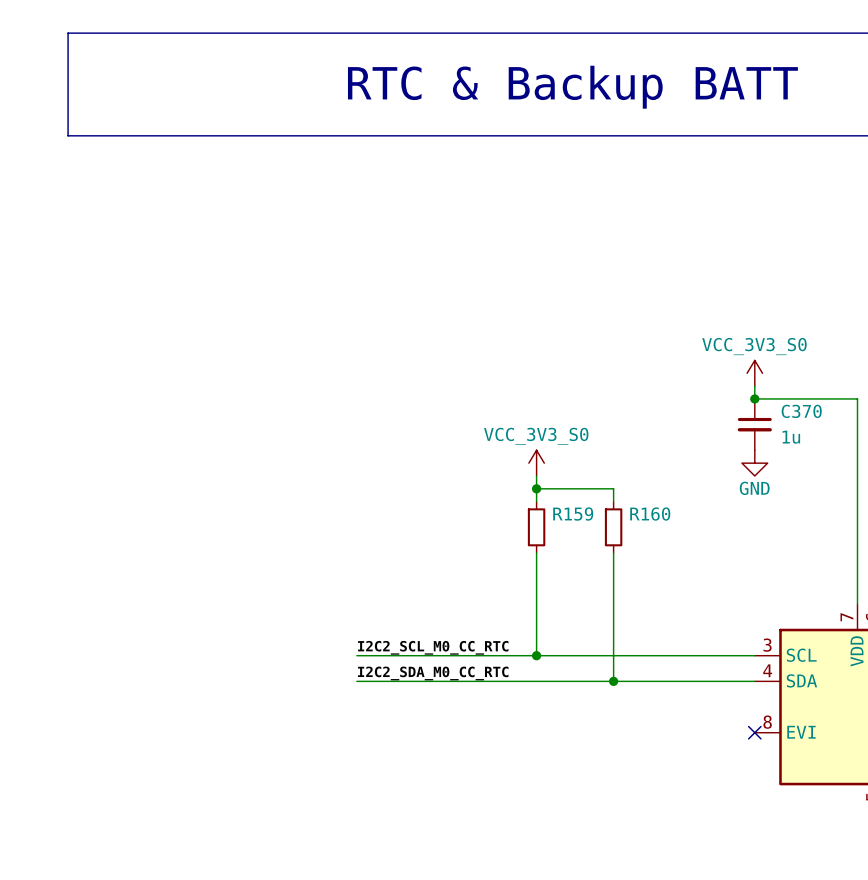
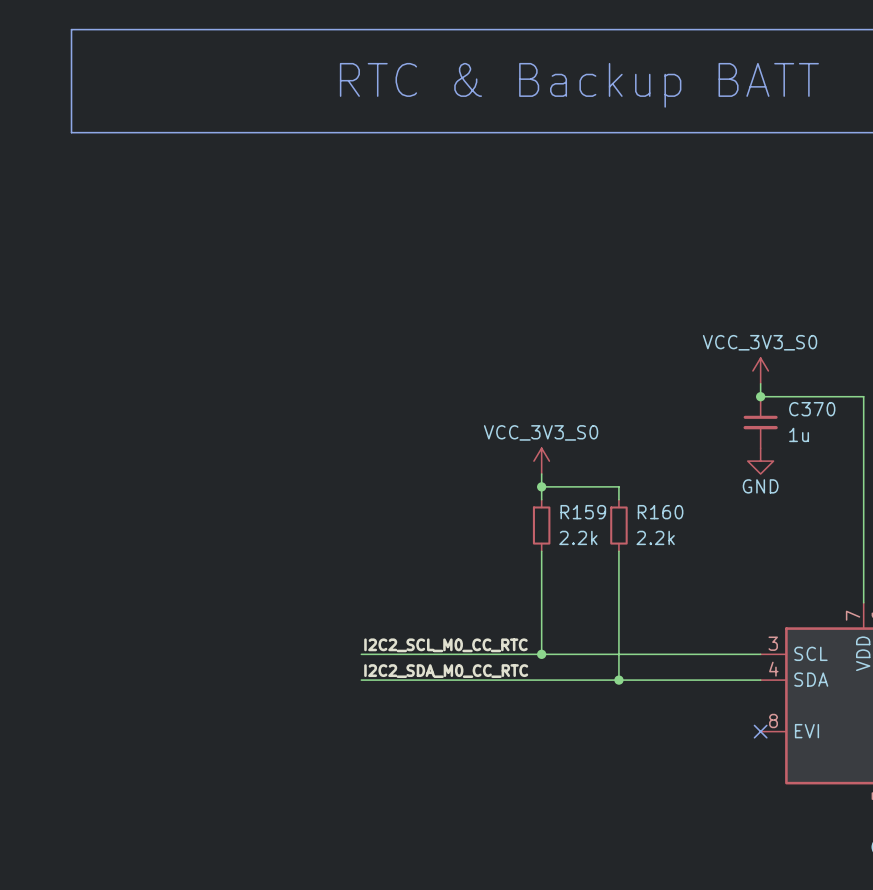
R159 value: none -> 2.2k (578, 537)
R160 value: none -> 2.2k (655, 537)

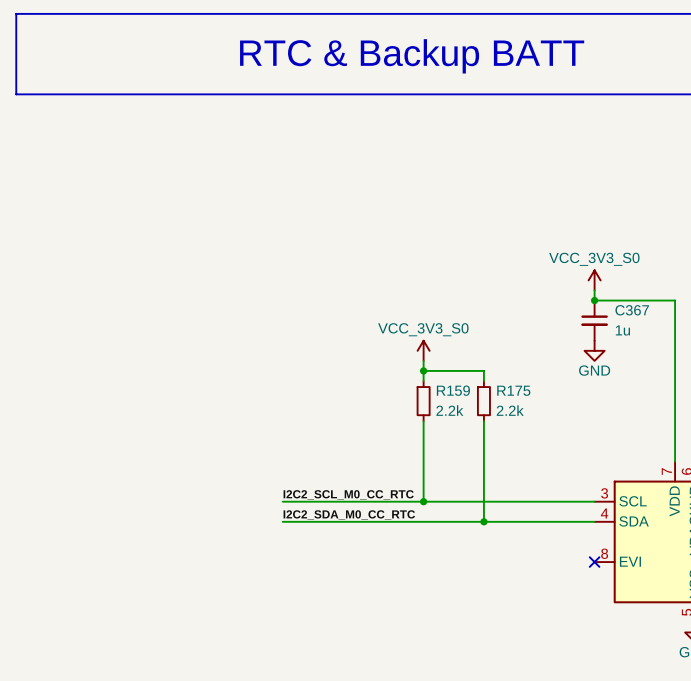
line: (71, 29) (71, 132) -> (56, 13) (16, 13) (16, 94) (56, 94)
text position: RTC & Backup BATT (579, 85) -> RTC & Backup BATT (412, 56)
C370 name: C370 (812, 409) -> C367 (632, 310)
R160 name: R160 (660, 512) -> R175 (513, 390)

